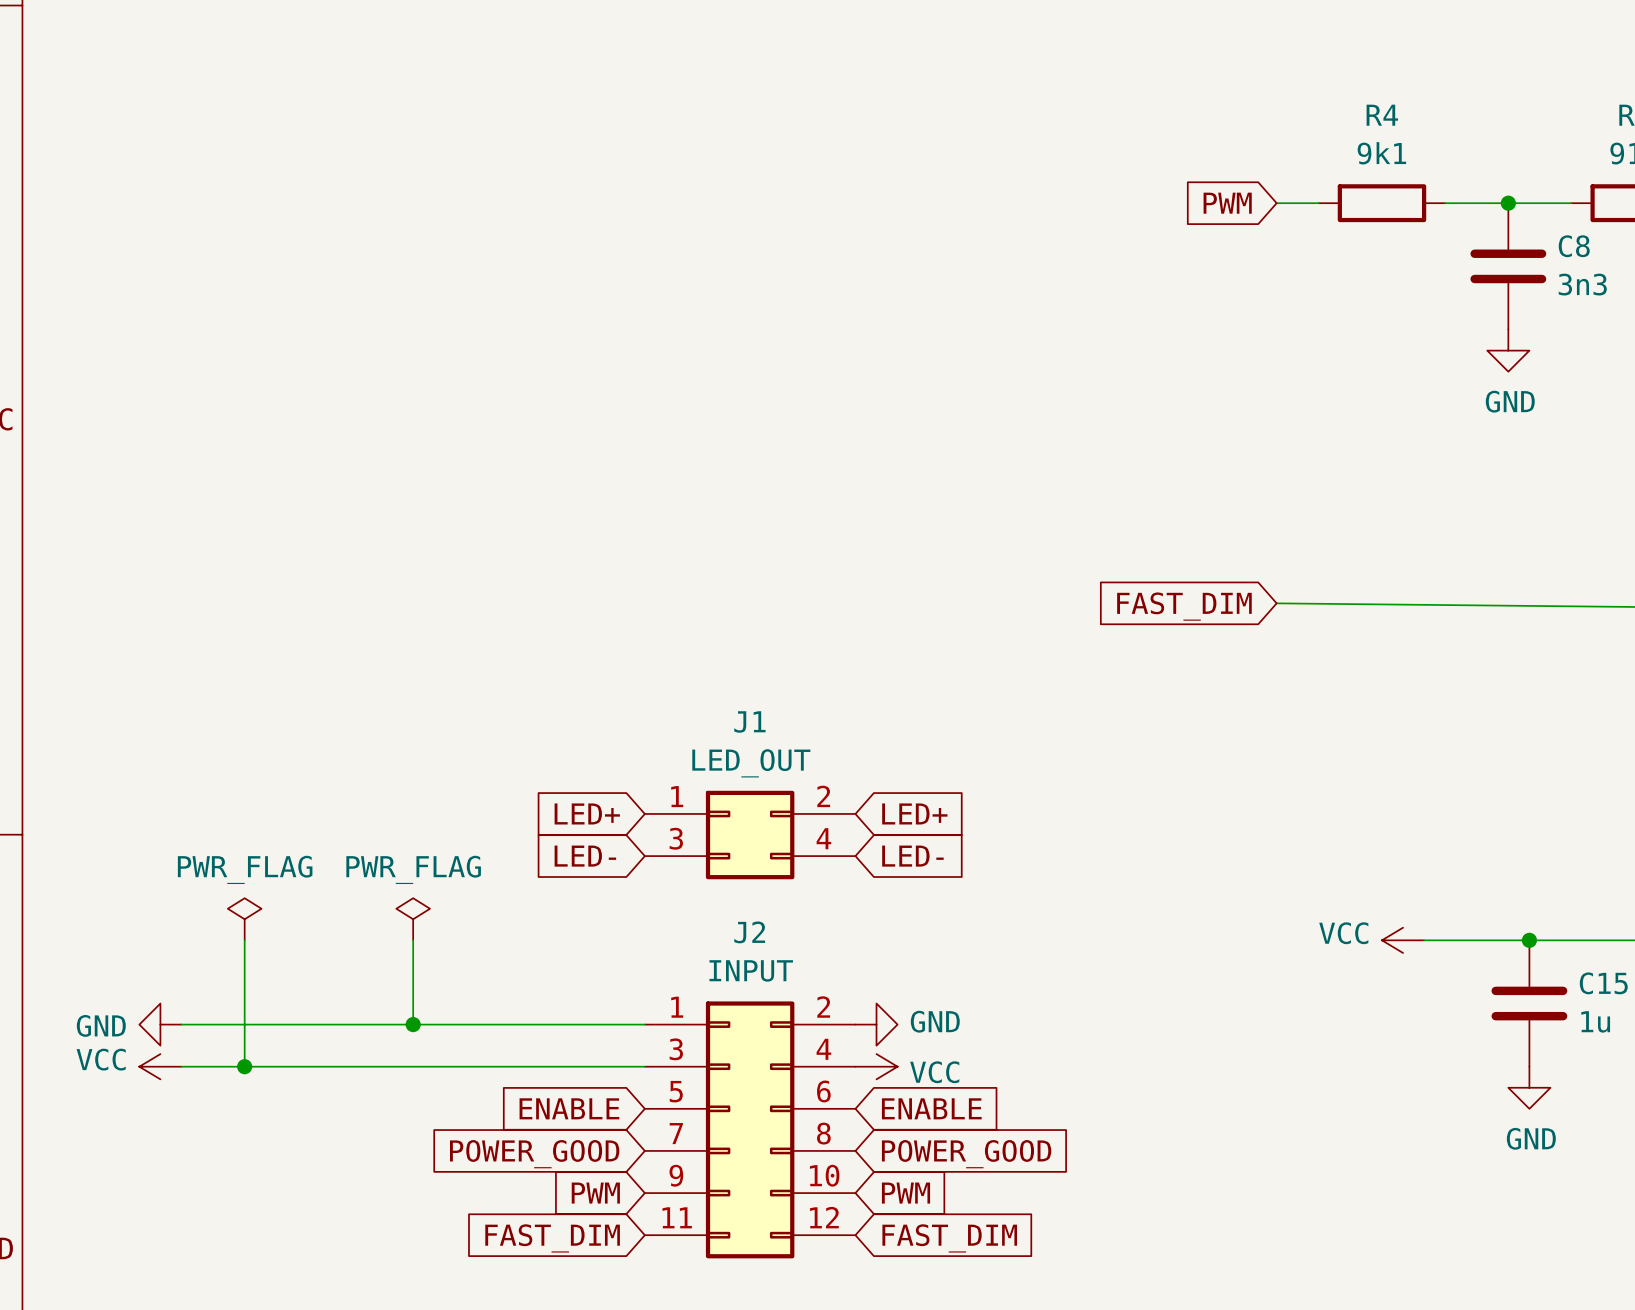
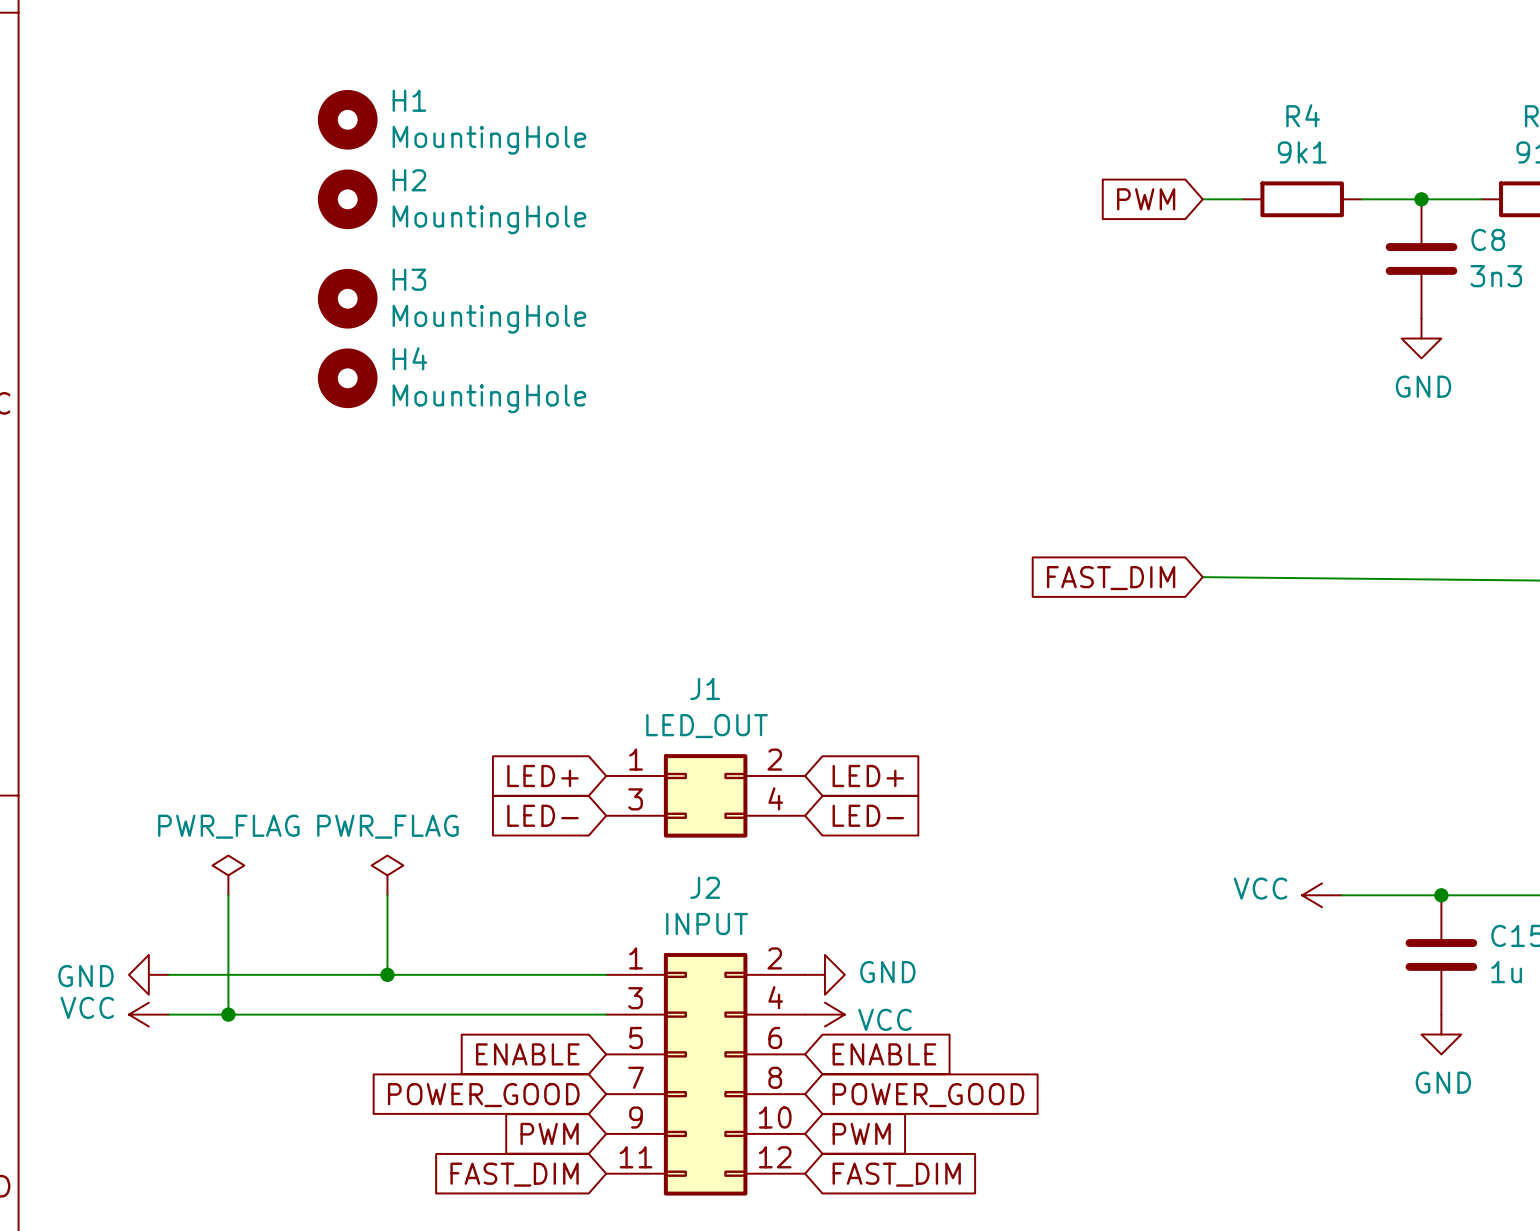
H1: none -> MountingHole (347, 119)
H2: none -> MountingHole (347, 199)
H3: none -> MountingHole (347, 298)
H4: none -> MountingHole (347, 378)

